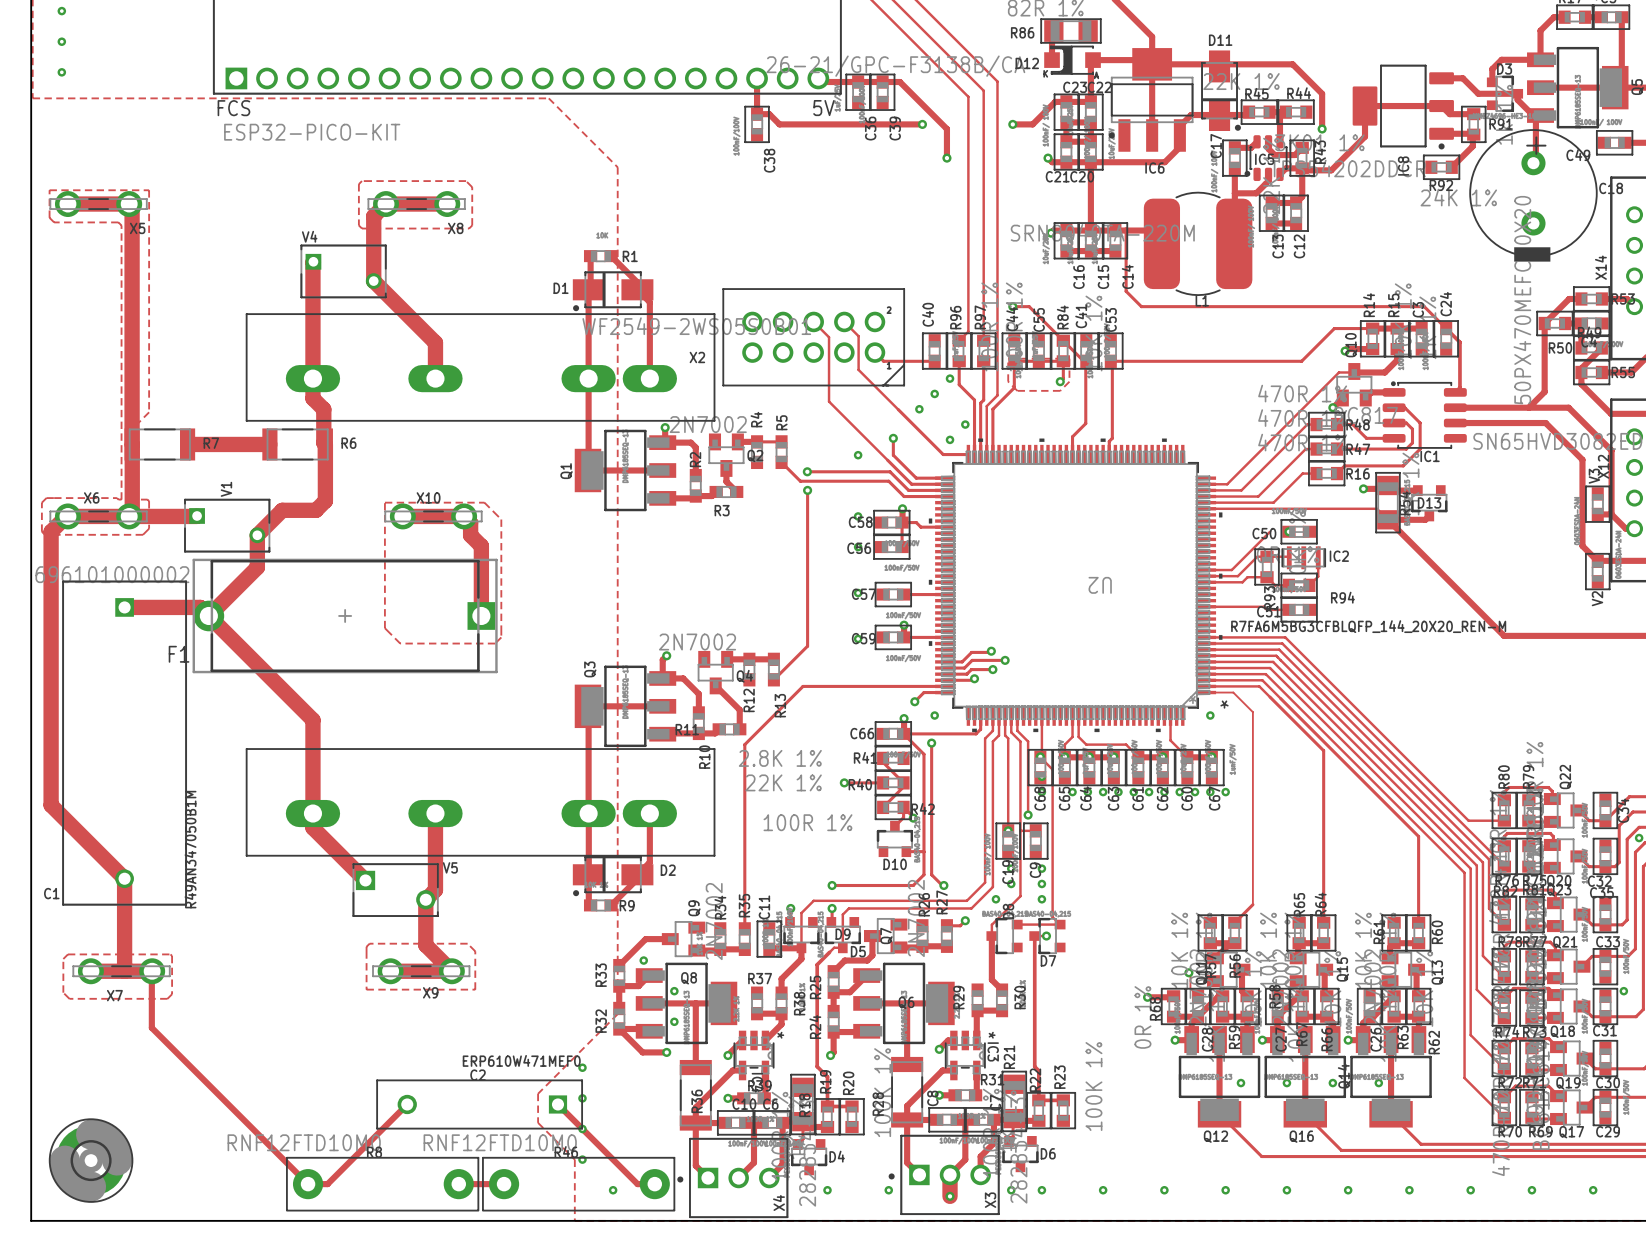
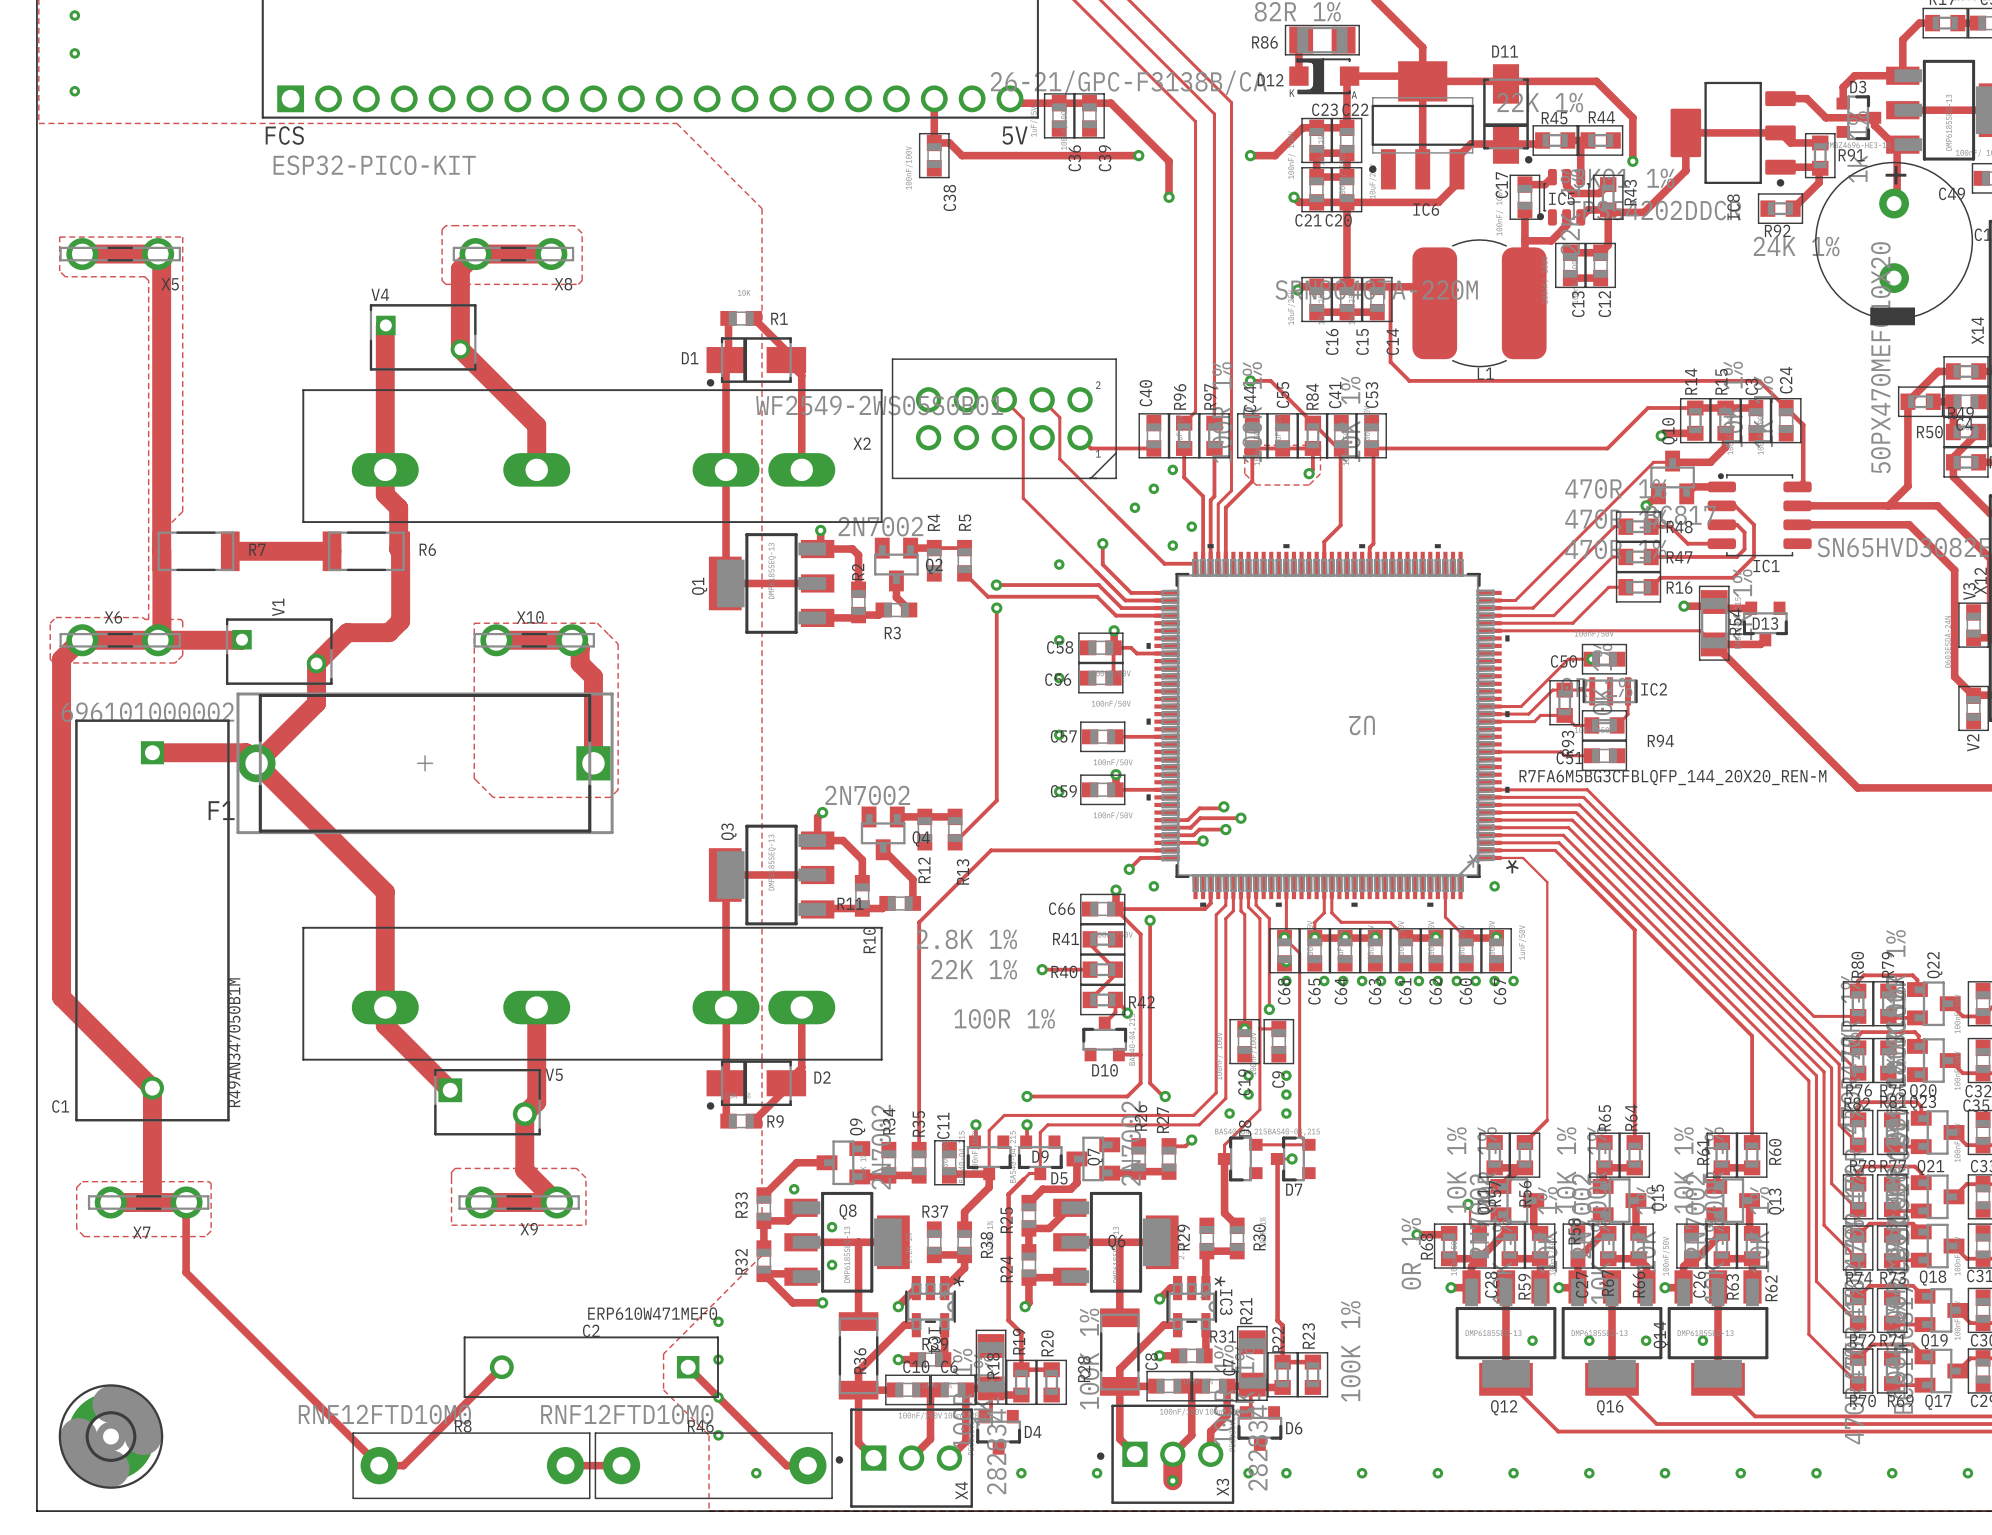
track: none -> (1568, 659) (1591, 659)

